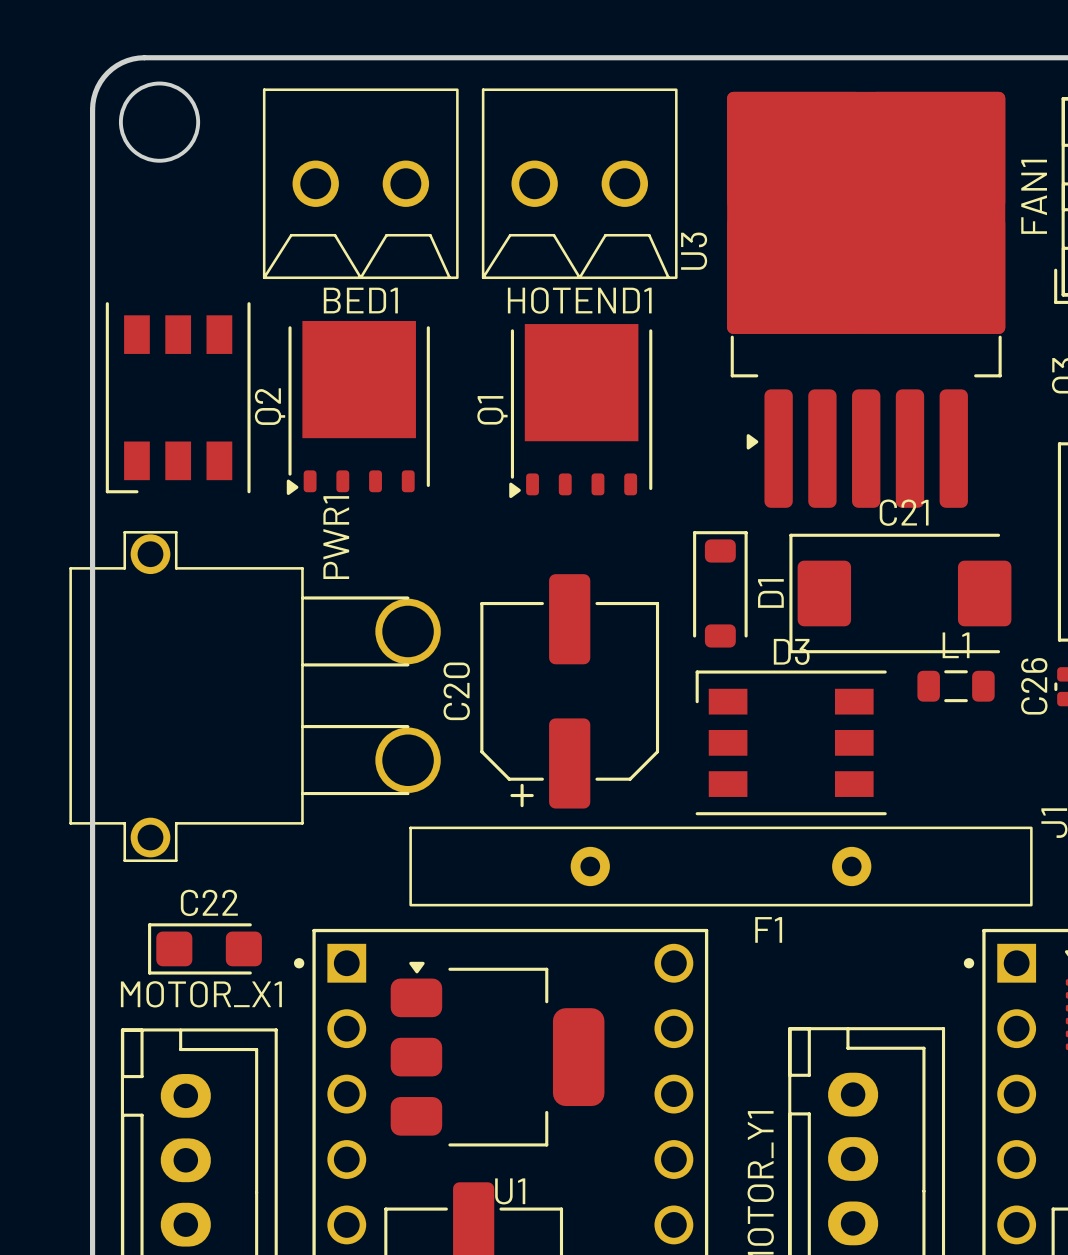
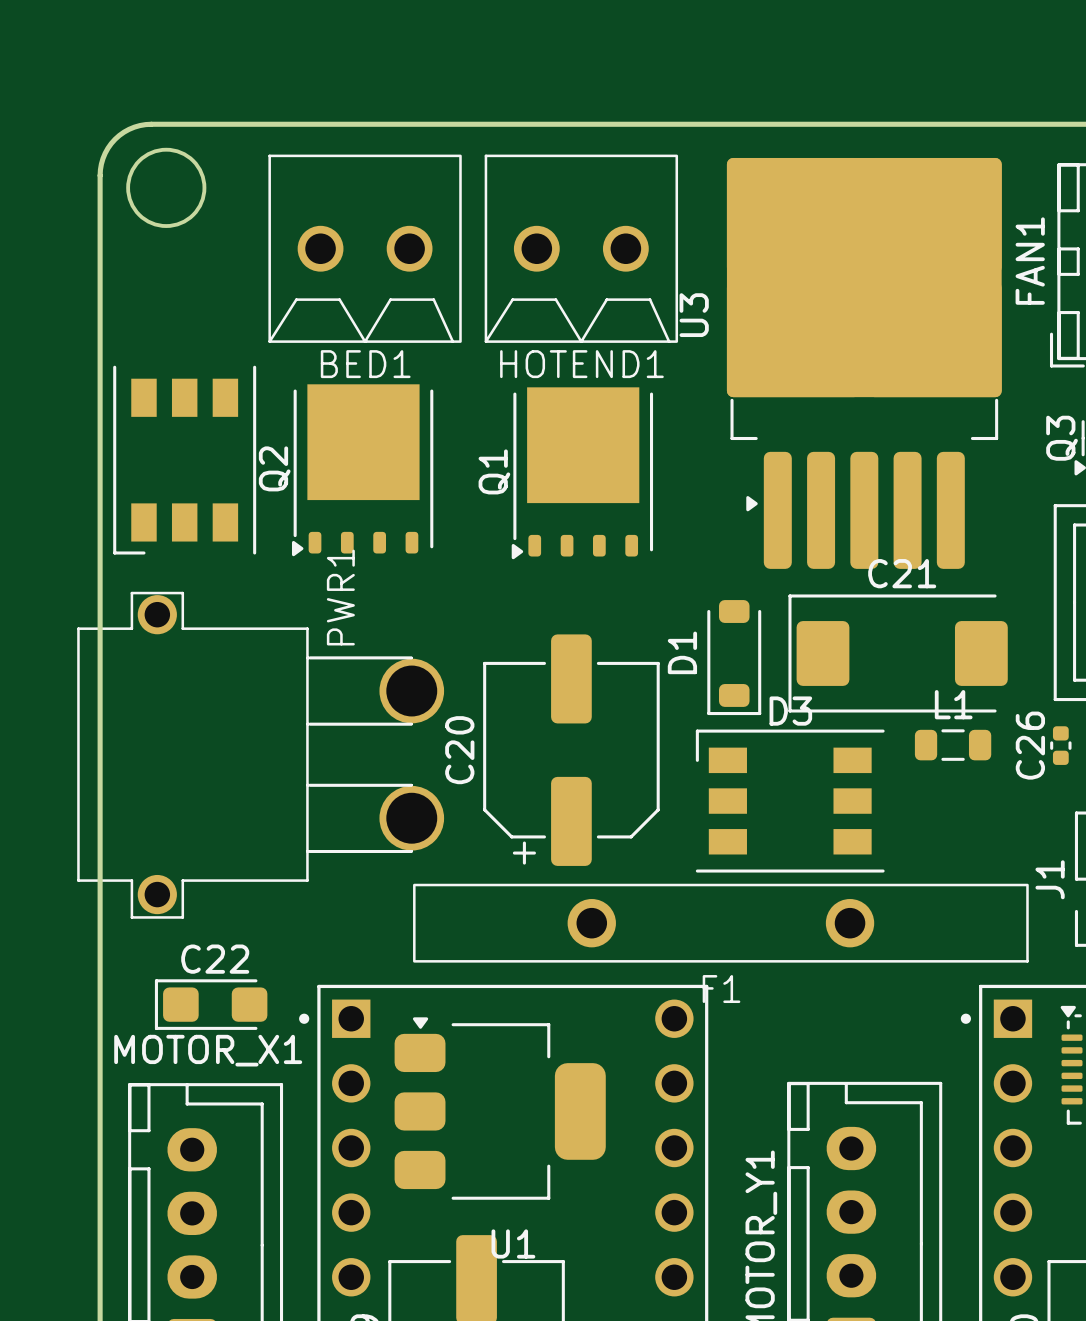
D1 rotation: 0° (720, 589) -> 180° (734, 657)
F1 footprint: [409, 826, 1033, 907] -> [413, 883, 1029, 963]
F1 name position: F1 (768, 929) -> F1 (721, 989)

